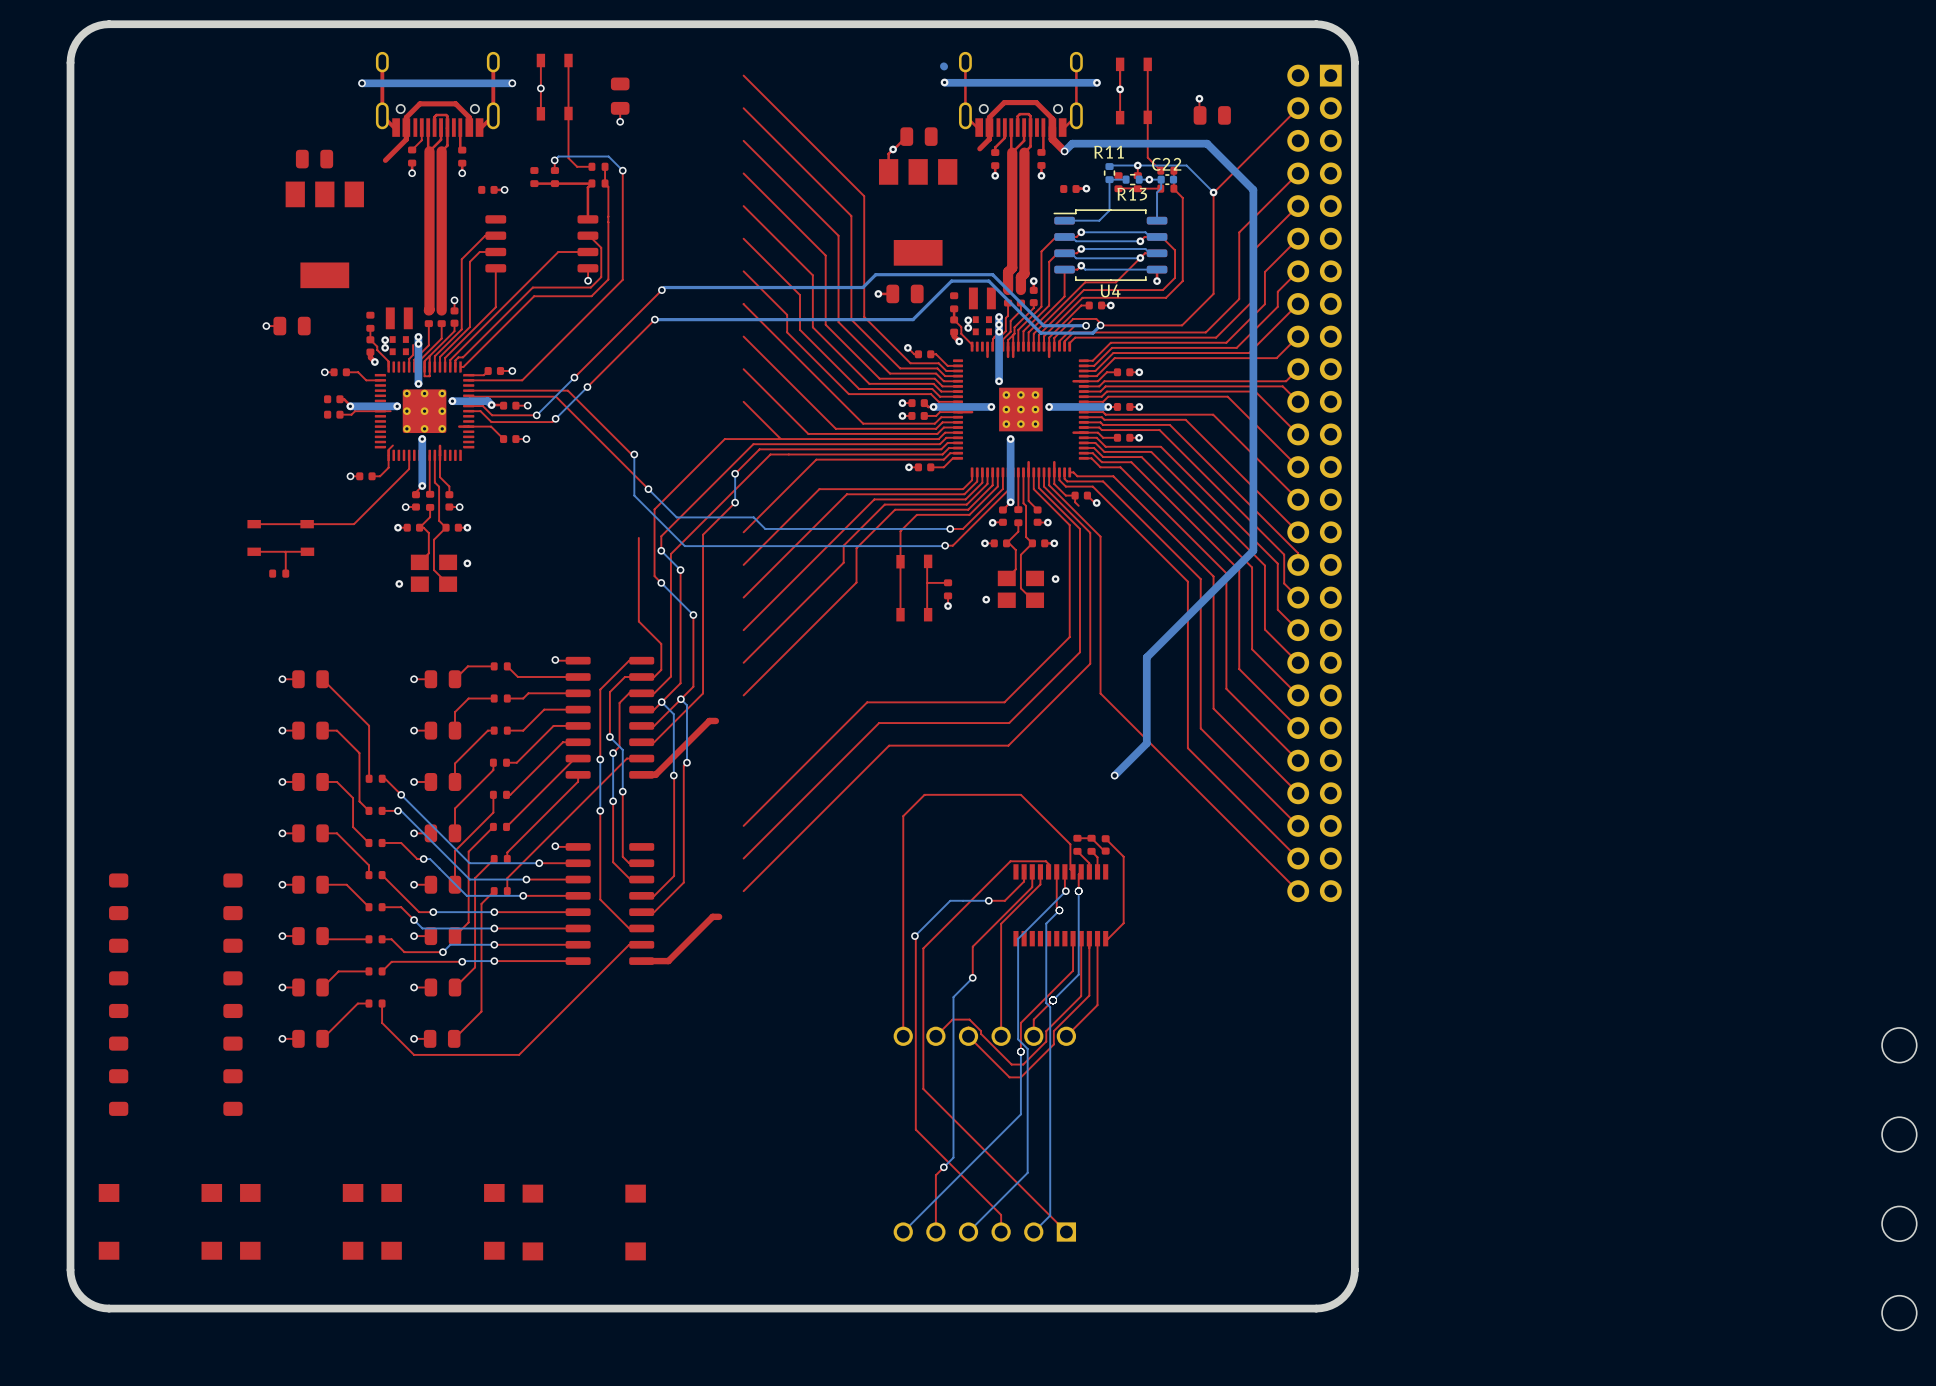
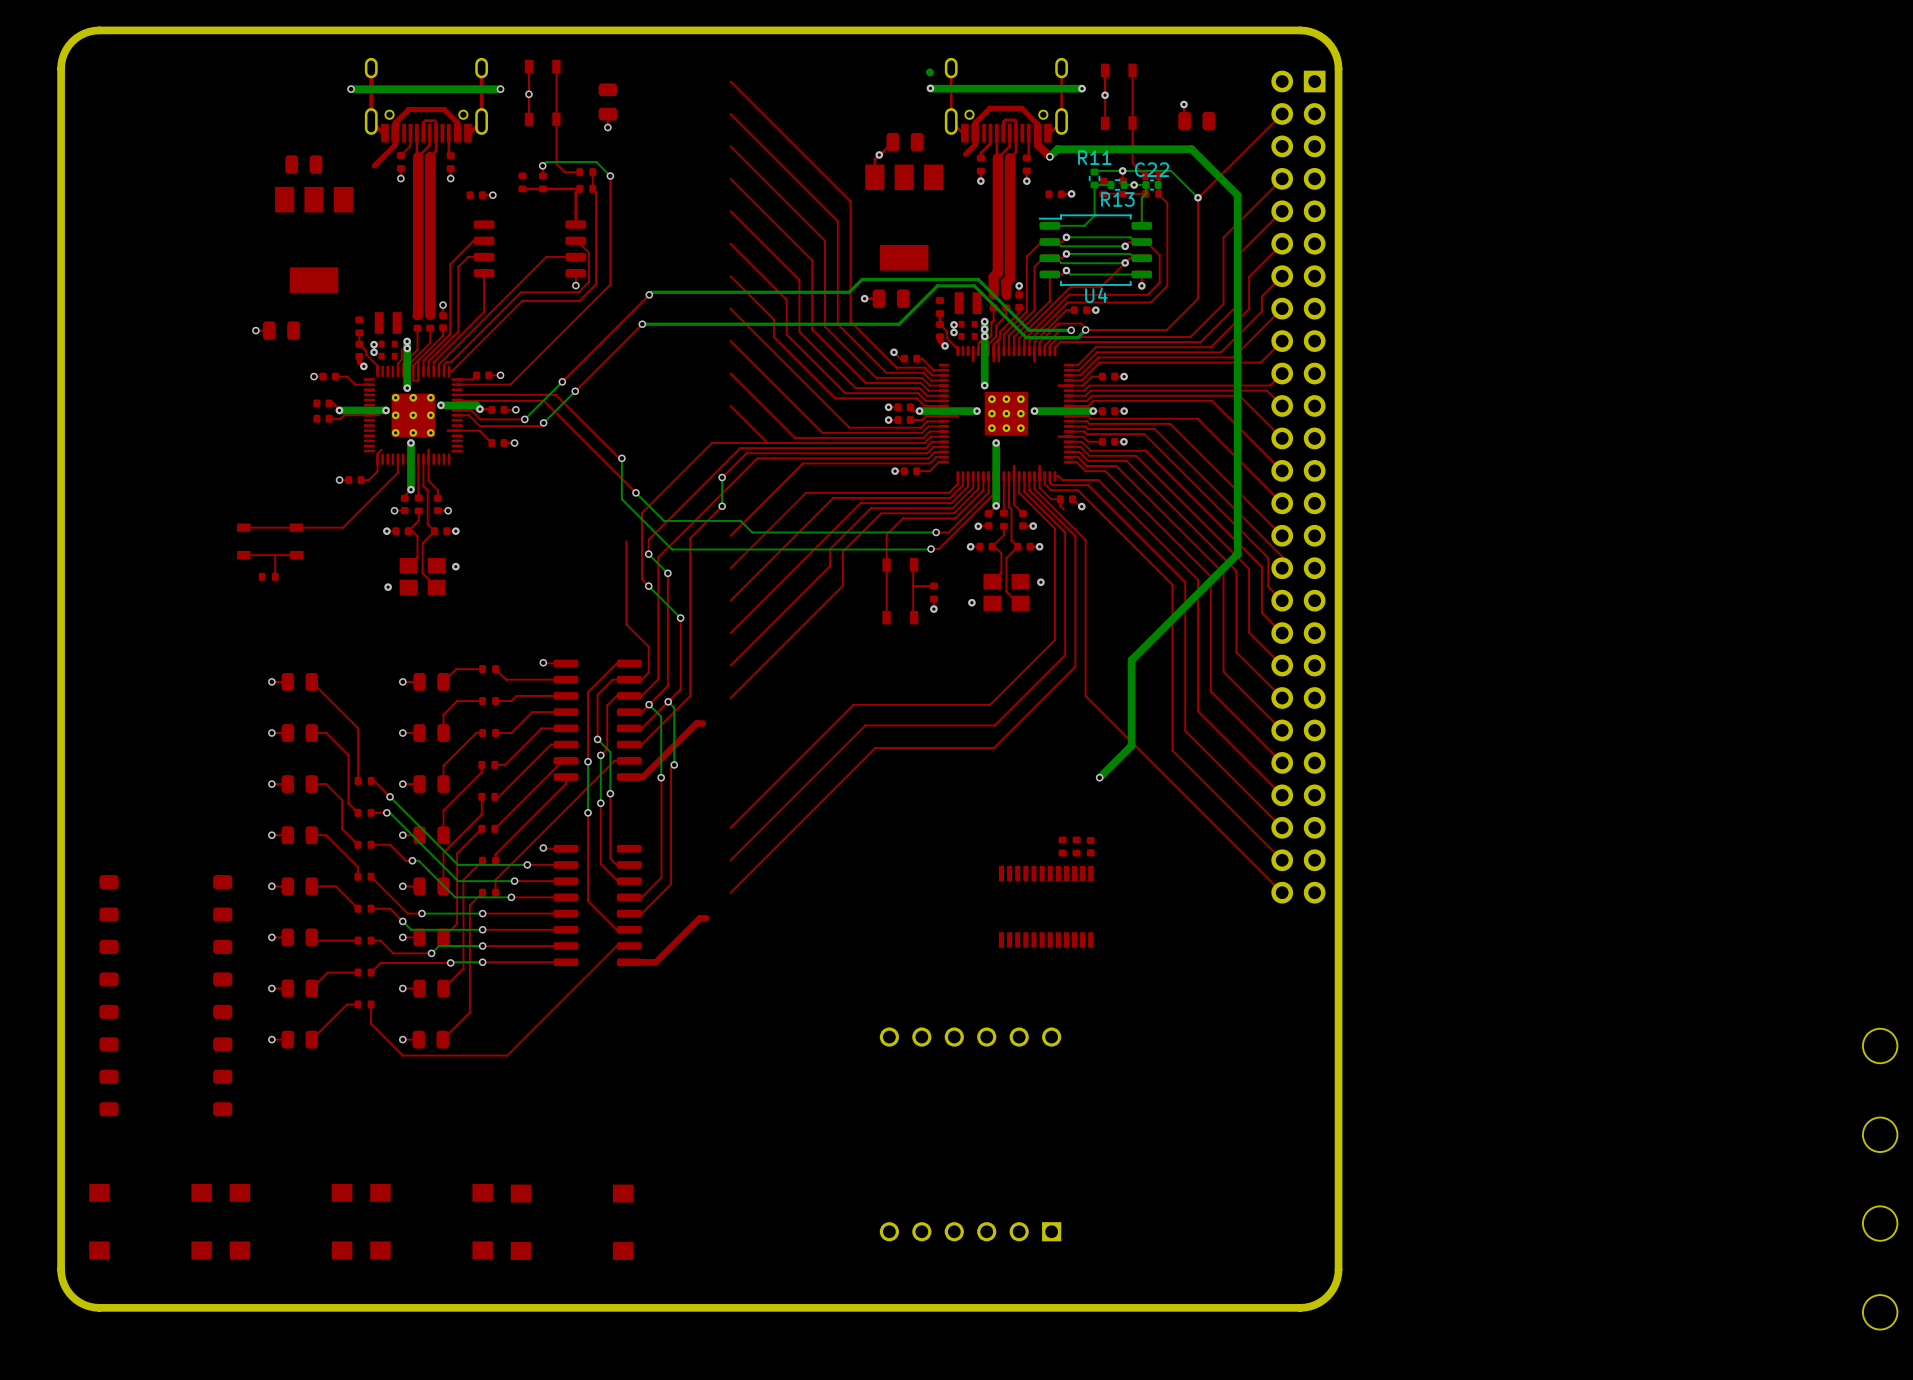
top track: (1077, 838) (1091, 838) (1105, 851) -> none
top track: (1105, 838) (1123, 856) (1123, 923) (1108, 938) (1105, 938) -> none
top track: (1077, 851) (1089, 863) (1089, 871) -> none
top track: (1091, 851) (1097, 857) (1097, 871) -> none
top track: (1024, 871) (1024, 881) (1004, 900) (988, 900) -> none
top track: (1032, 871) (1032, 887) (972, 946) (972, 977) -> none
top track: (1040, 871) (1040, 884) (1001, 923) (1001, 1036) -> none
top track: (1048, 871) (1048, 863) (1045, 861) (1010, 861) (923, 948) (923, 1088) (1066, 1232) -> none
top track: (1056, 871) (1056, 907) (1059, 910) -> none
top track: (1064, 871) (1065, 891) -> none
top track: (1073, 871) (1070, 869) (1070, 844) (1020, 794) (924, 794) (903, 816) (903, 1036) -> none
top track: (1081, 871) (1078, 874) (1078, 891) -> none
bottom track: (1065, 891) (1018, 938) (1018, 1039) (1027, 1048) (1027, 1172) (968, 1232) -> none
via: (1065, 891) -> none
bottom track: (1078, 891) (1078, 974) (1053, 1000) -> none
via: (1078, 891) -> none
bottom track: (988, 900) (950, 900) (914, 936) -> none
via: (988, 900) -> none
bottom track: (1059, 910) (1046, 923) (1046, 1003) (1050, 1007) (1050, 1215) (1033, 1232) -> none
via: (1059, 910) -> none
top track: (914, 936) (915, 1129) (1001, 1214) (1001, 1232) -> none
via: (914, 936) -> none
top track: (1073, 938) (1073, 970) (1020, 1022) (1020, 1051) -> none
top track: (1081, 938) (1081, 996) (1046, 1031) (1046, 1041) (1023, 1064) (1011, 1064) (969, 1019) (952, 1019) (935, 1036) -> none
top track: (1089, 938) (1089, 995) (1053, 1031) (1053, 1044) (1020, 1077) (1009, 1077) (968, 1036) (968, 1027) -> none
top track: (1097, 938) (1097, 1005) (1066, 1036) -> none
bottom track: (972, 977) (953, 997) (953, 1157) (943, 1167) -> none
via: (972, 977) -> none
top track: (1053, 1000) (1033, 1019) (1033, 1036) -> none
via: (1053, 1000) -> none
bottom track: (1020, 1051) (1020, 1114) (903, 1232) -> none
via: (1020, 1051) -> none
top track: (943, 1167) (935, 1175) (935, 1232) -> none
via: (943, 1167) -> none

